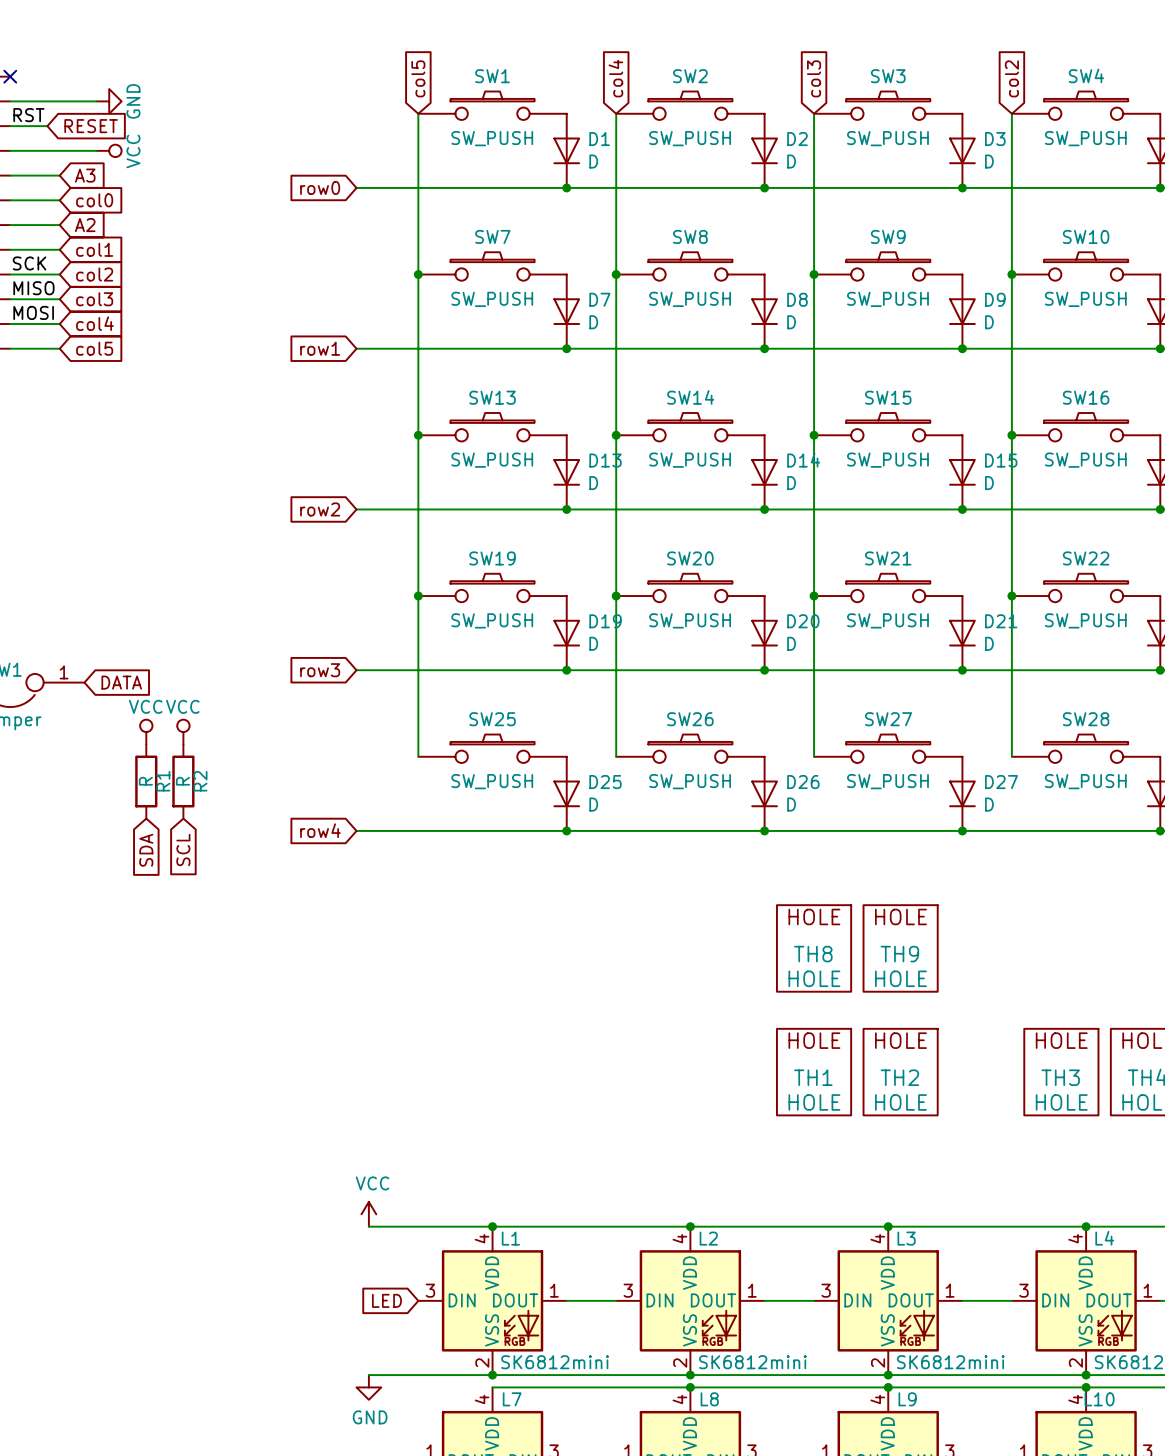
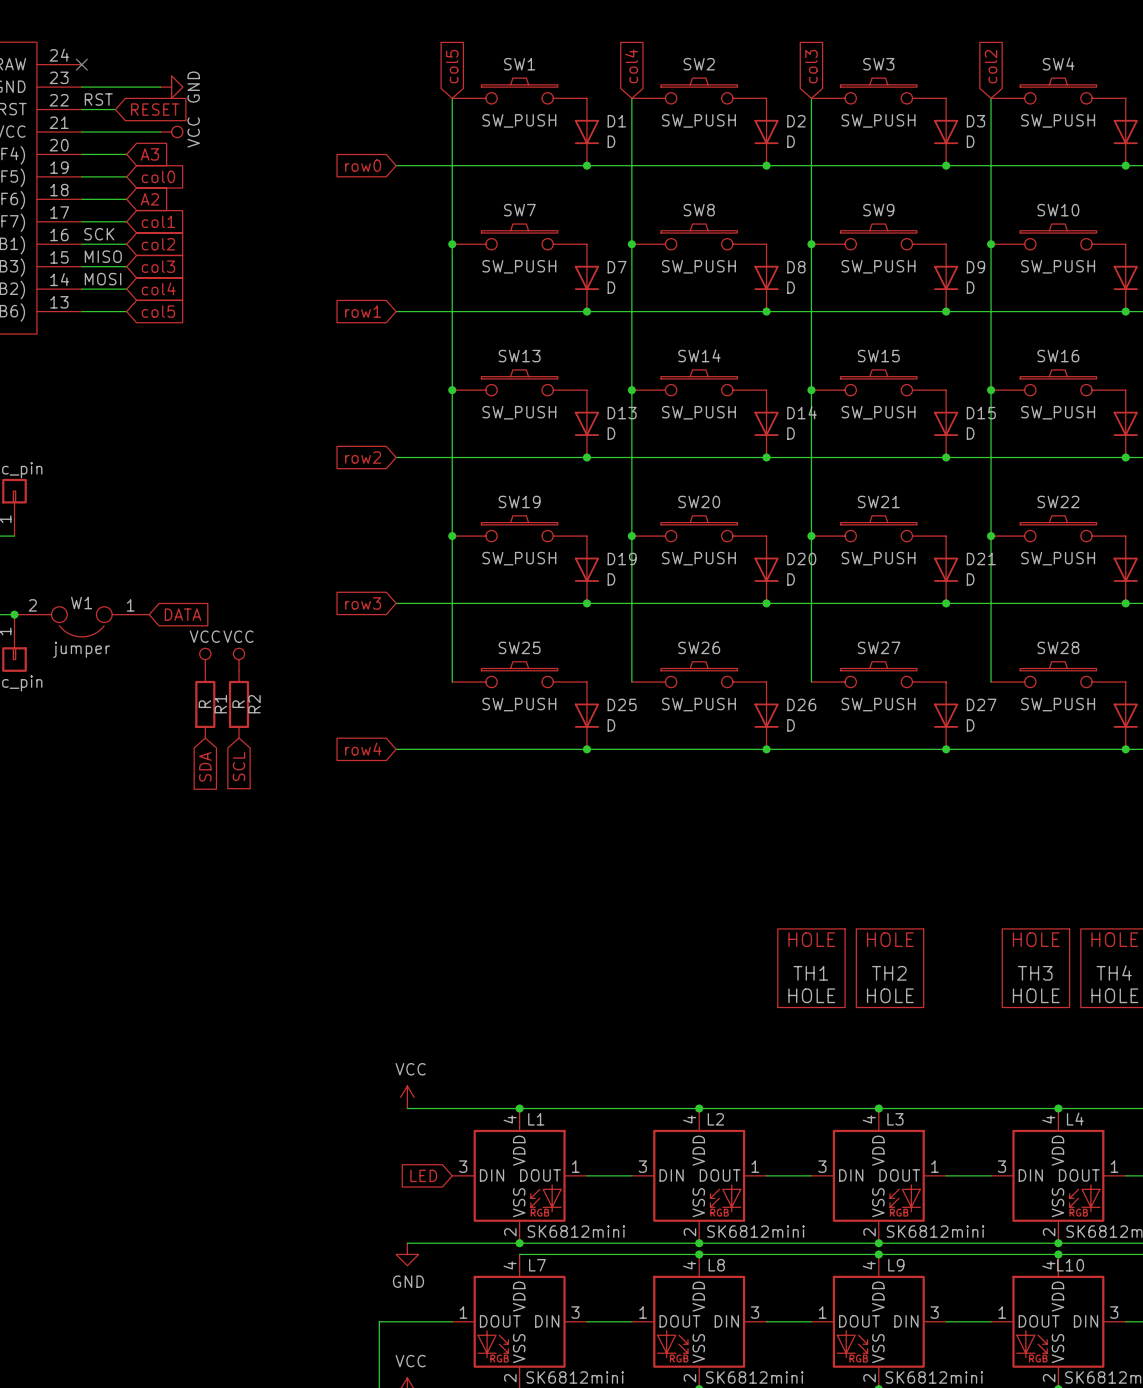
TH8: HOLE (814, 948) -> none
TH9: HOLE (900, 948) -> none

